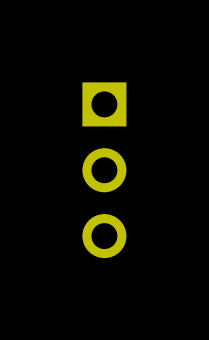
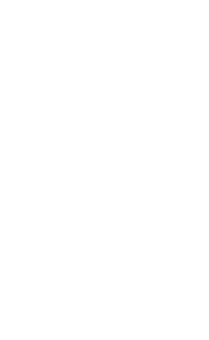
part: (104, 170) -> none

